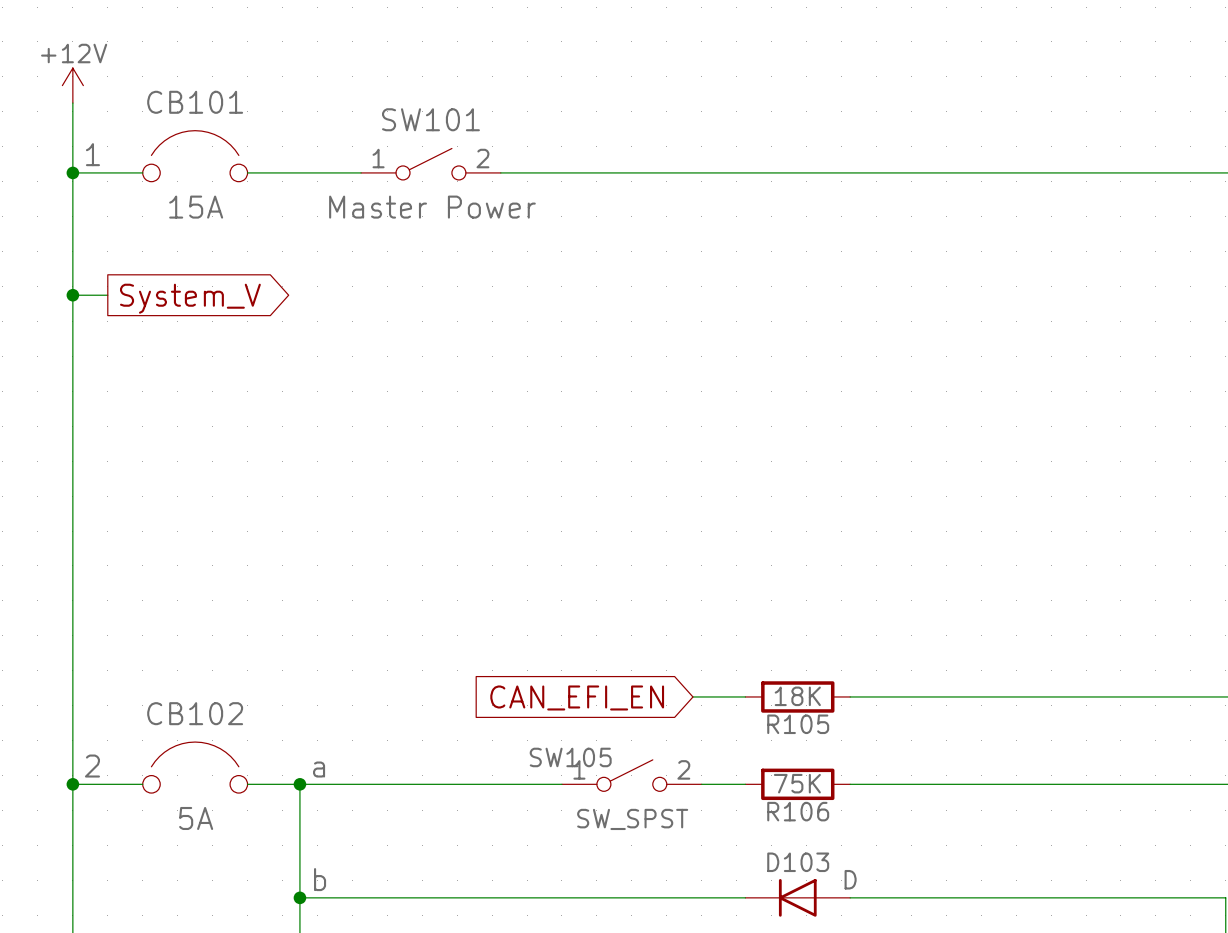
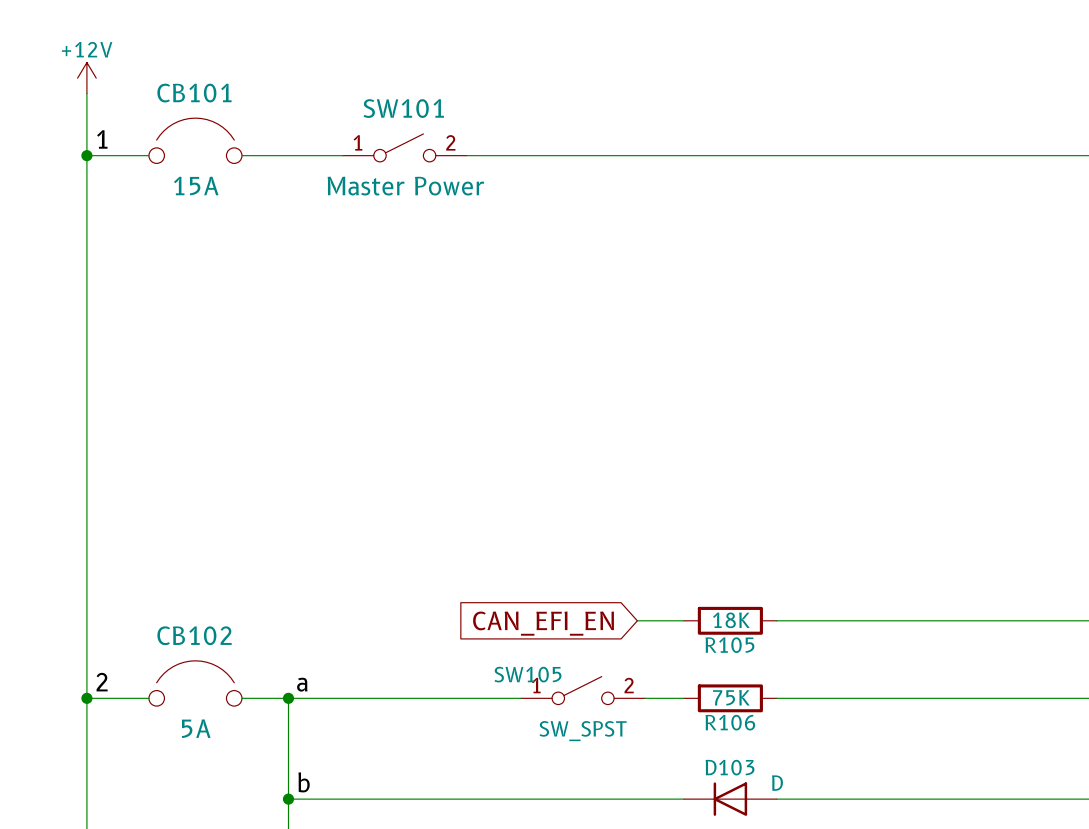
wire: (72, 295) (107, 295) -> none
junction: (72, 295) -> none
global label: System_V (190, 298) -> none

